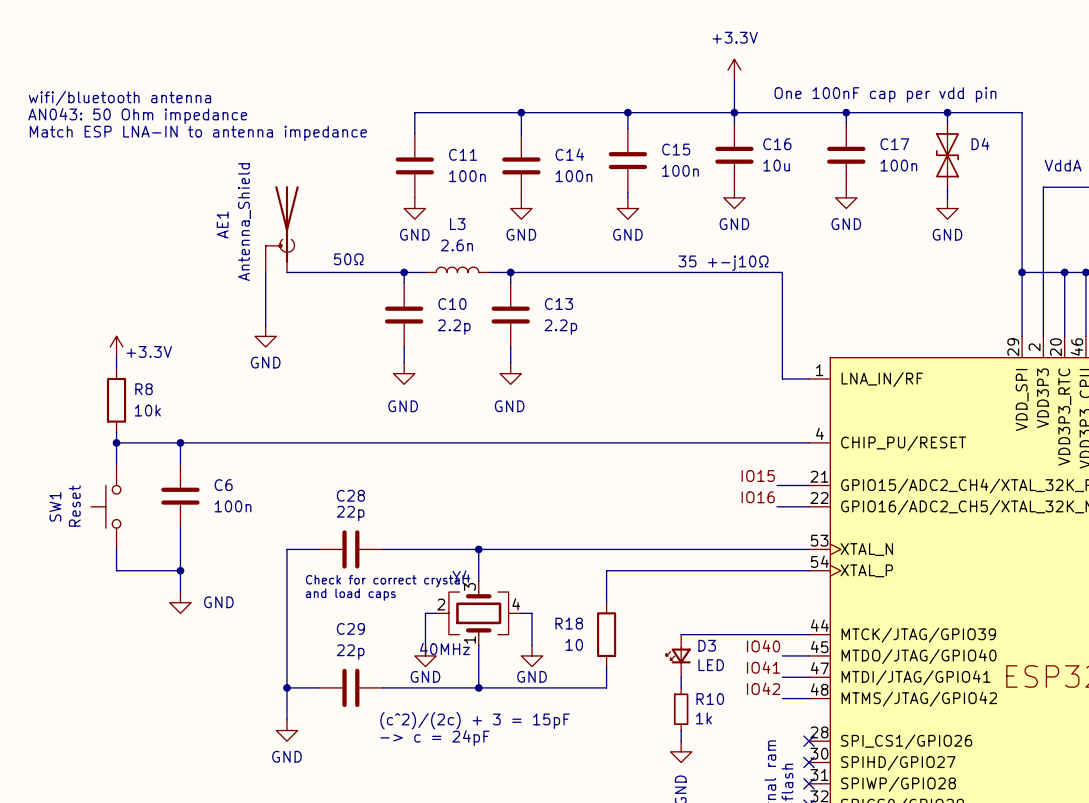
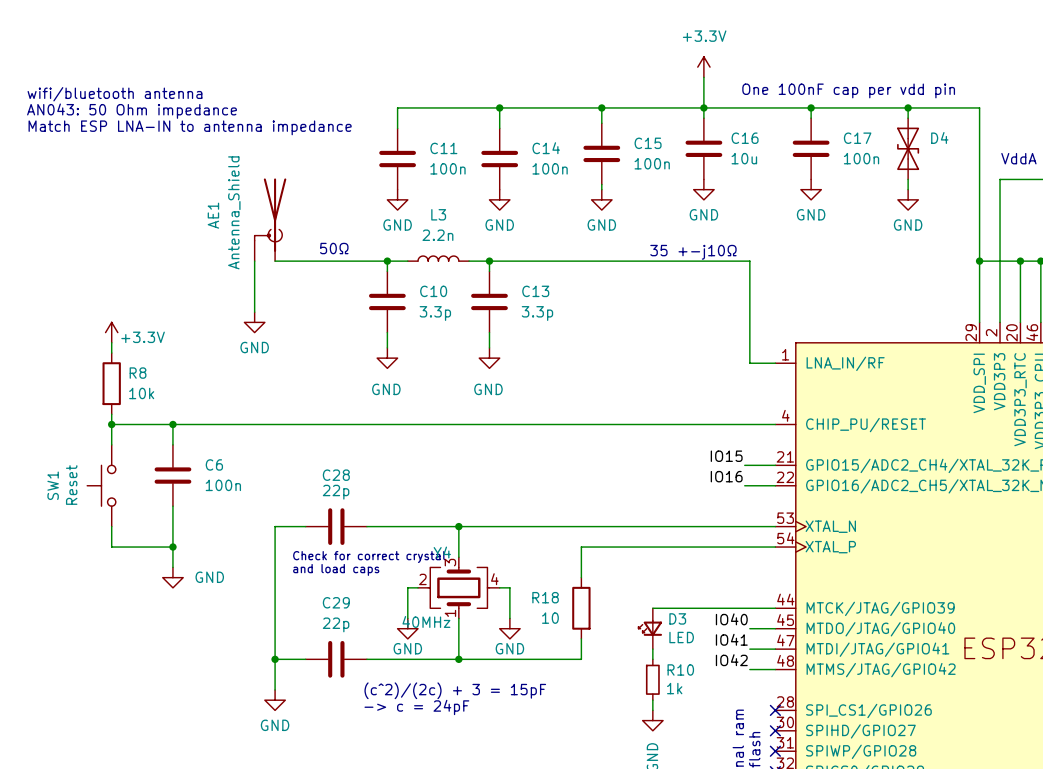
L3 value: 2.6n (456, 245) -> 2.2n (437, 235)
C10 value: 2.2p (454, 327) -> 3.3p (435, 313)
C13 value: 2.2p (560, 327) -> 3.3p (537, 313)

